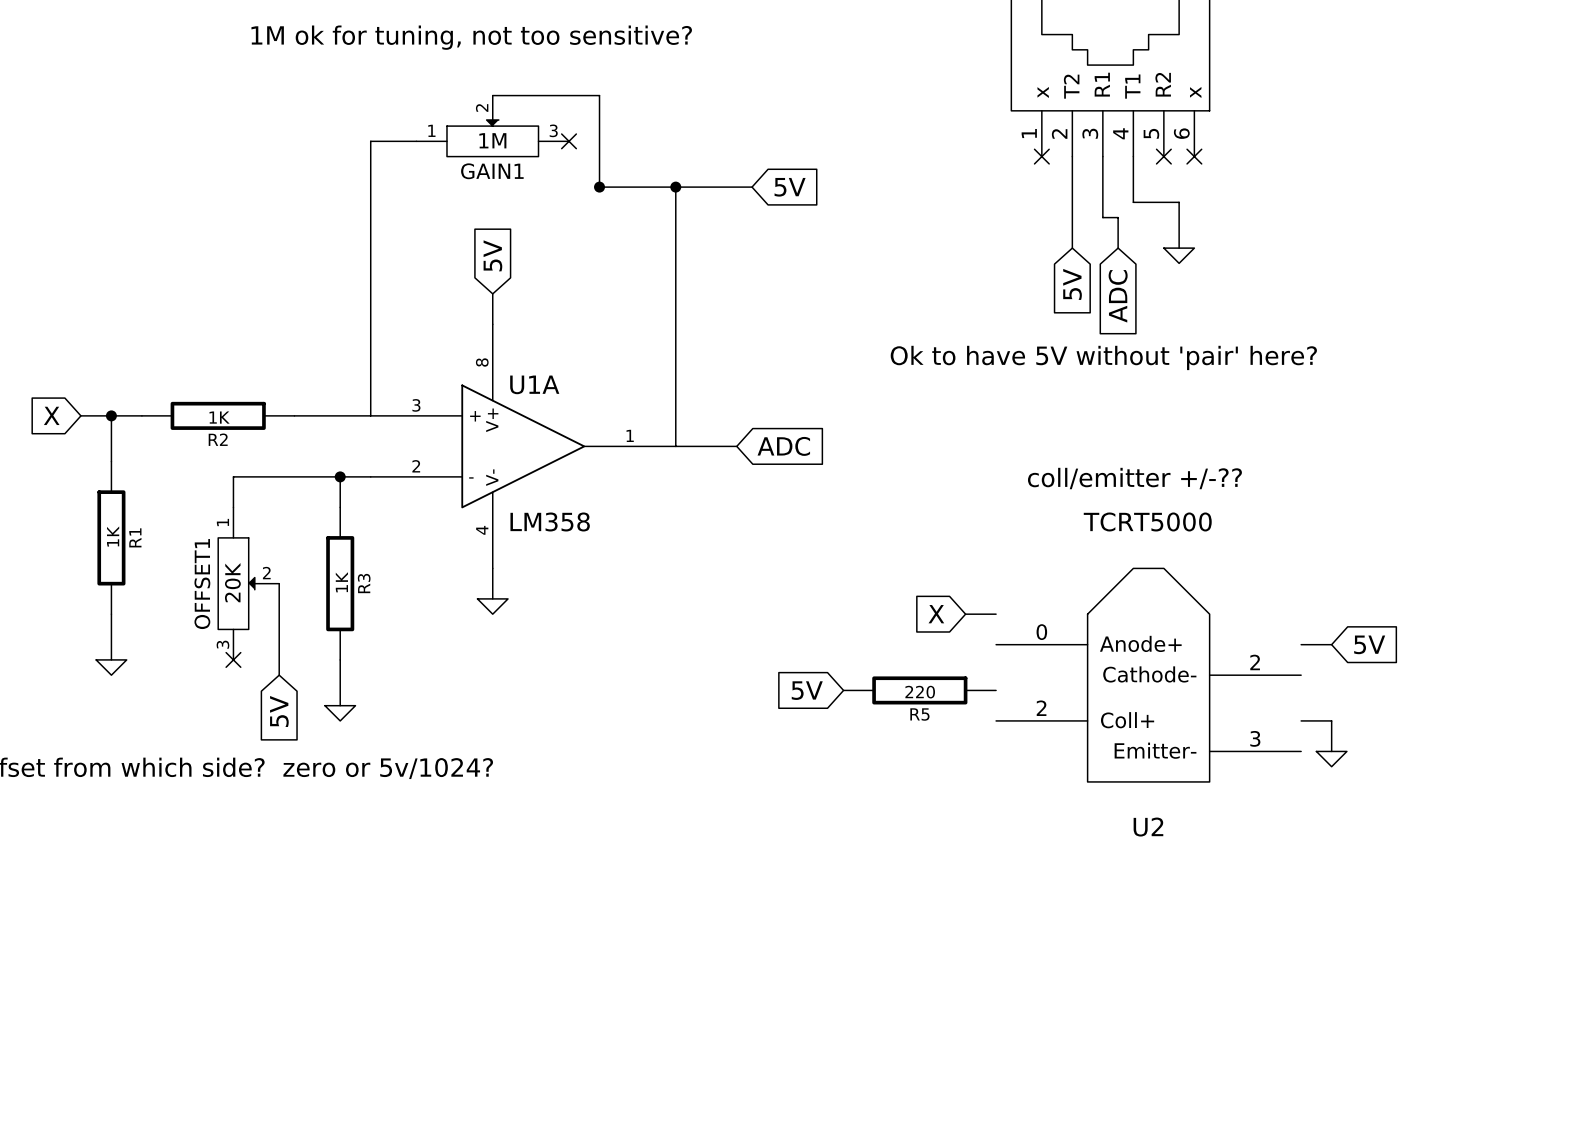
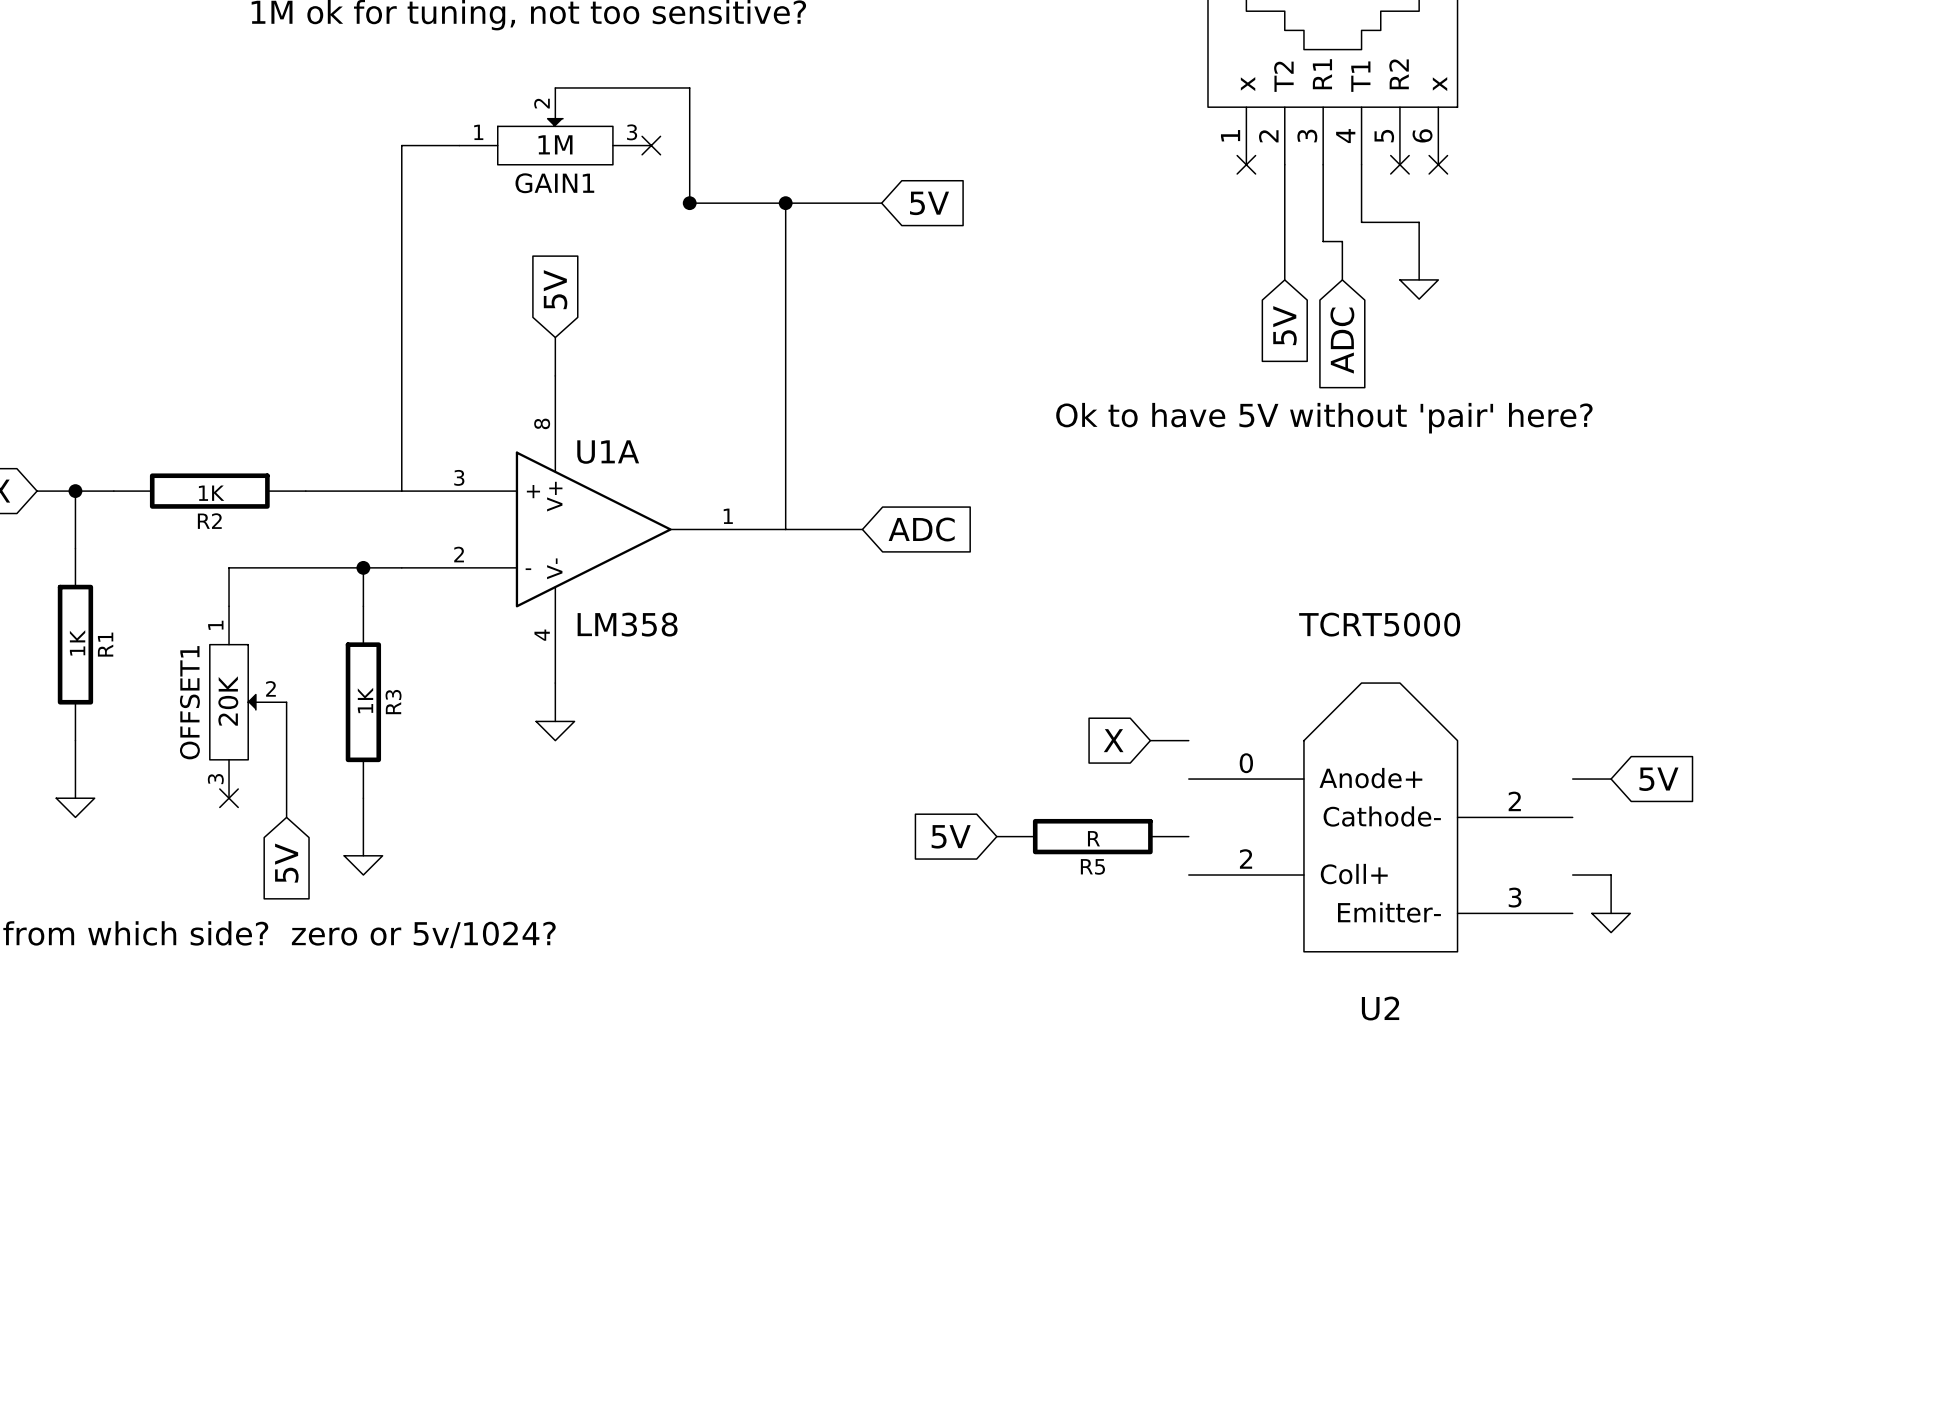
text: coll/emitter +/-?? (1134, 478) -> none
R5 value: 220 (920, 692) -> R (1093, 838)

